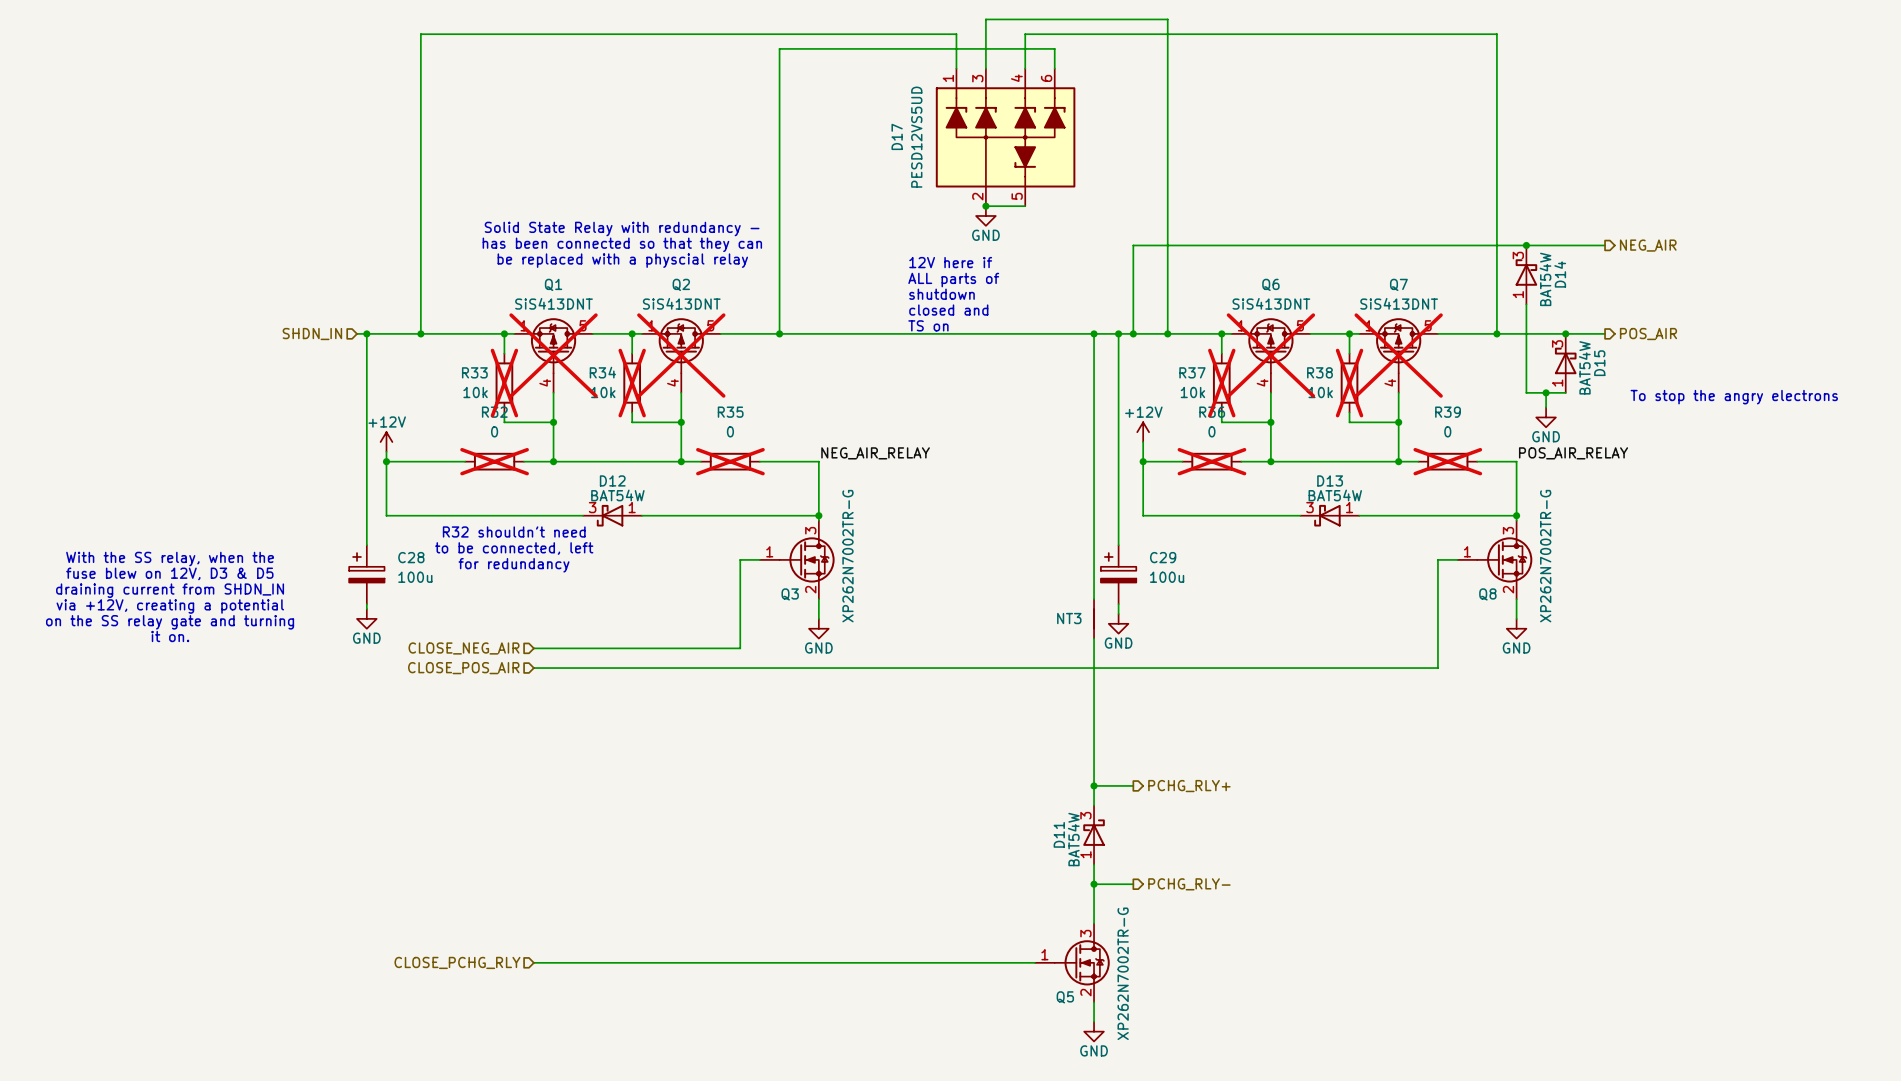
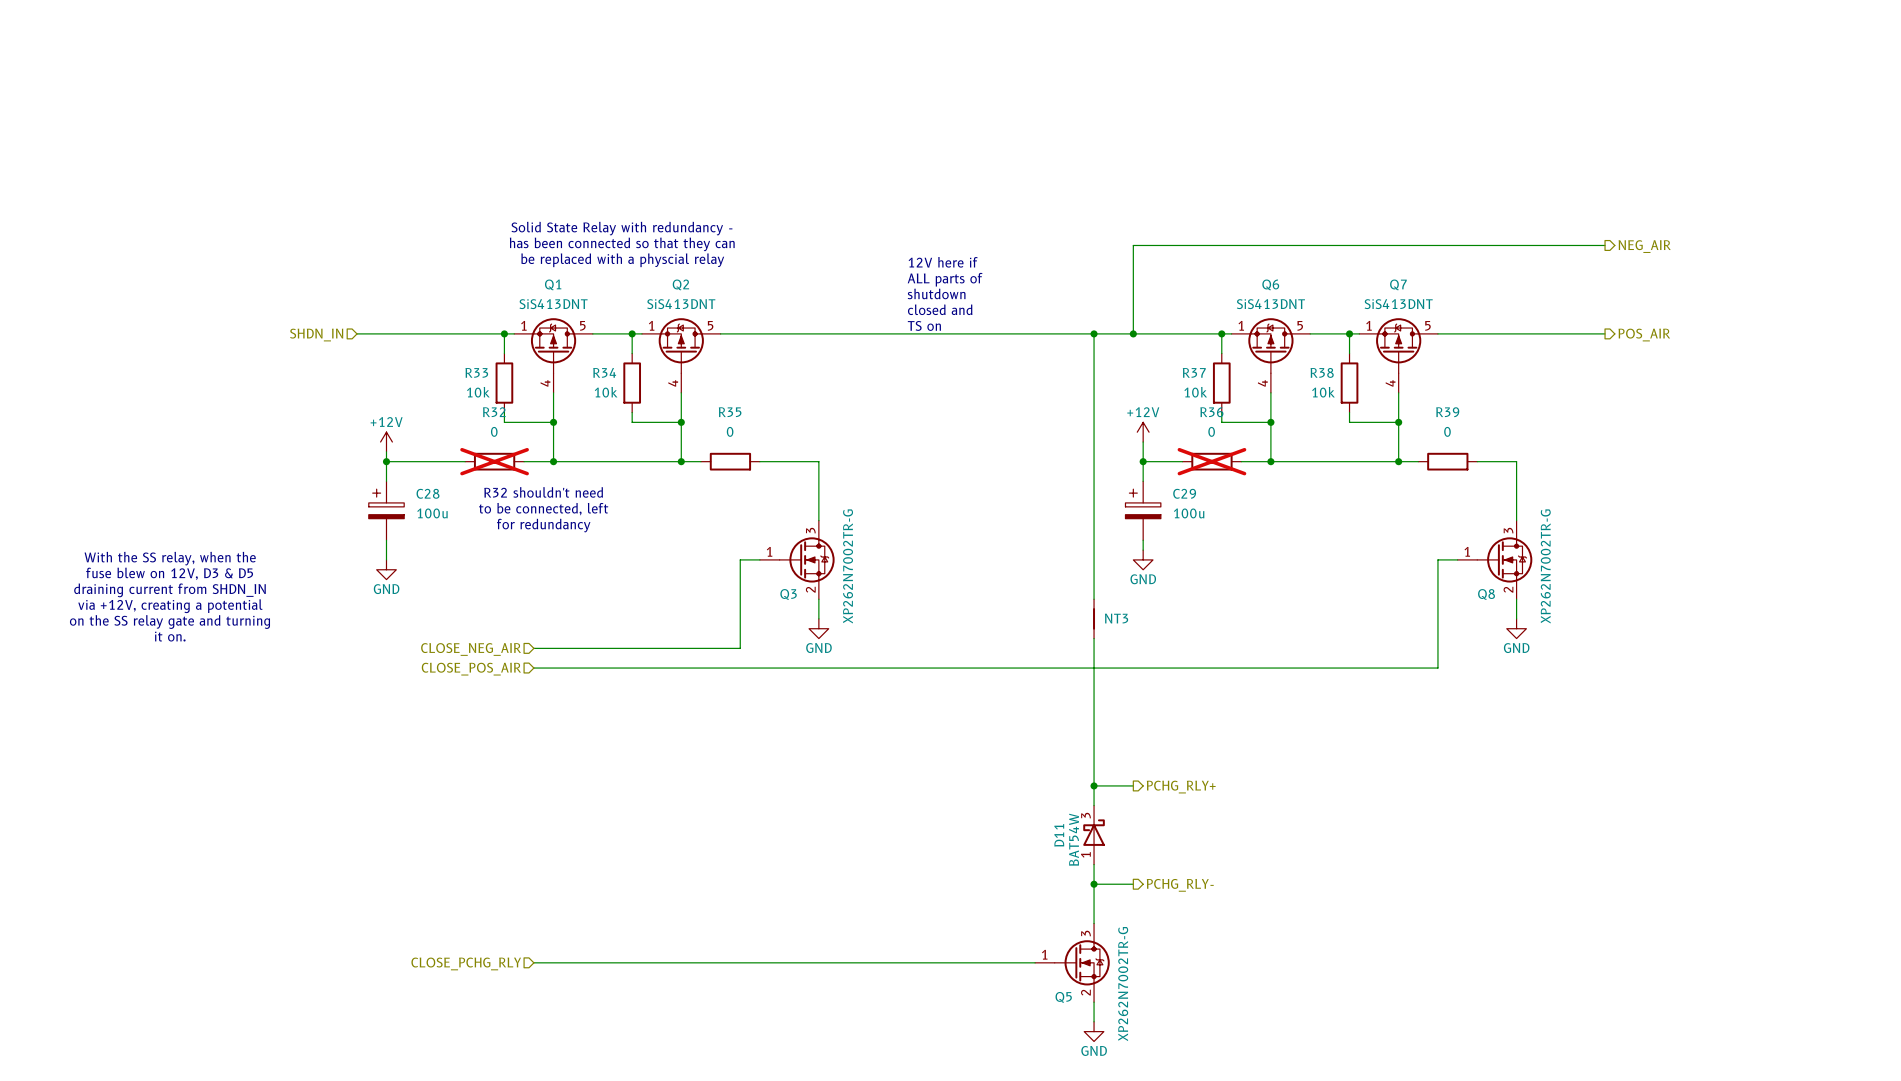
wire: (956, 68) (956, 34) (420, 34) (420, 333) -> none
wire: (985, 68) (985, 19) (1167, 19) (1167, 333) -> none
wire: (1025, 68) (1025, 34) (1496, 34) (1496, 333) -> none
wire: (1054, 68) (1054, 48) (779, 48) (779, 333) -> none
D17: PESD12VS5UD (1005, 137) -> none
wire: (985, 206) (1025, 206) -> none
junction: (985, 206) -> none
power symbol: GND (985, 215) -> none
junction: (1526, 245) -> none
D14: BAT54W (1526, 274) -> none
wire: (1526, 304) (1526, 392) (1565, 392) -> none
wire: (366, 333) (366, 545) -> none
junction: (366, 333) -> none
junction: (420, 333) -> none
junction: (779, 333) -> none
wire: (1118, 333) (1118, 545) -> none
junction: (1118, 333) -> none
junction: (1167, 333) -> none
junction: (1496, 333) -> none
junction: (1565, 333) -> none
Q1 do-not-place cross: (553, 355) -> none
Q2 do-not-place cross: (681, 355) -> none
Q6 do-not-place cross: (1270, 355) -> none
Q7 do-not-place cross: (1398, 355) -> none
D15: BAT54W (1565, 363) -> none
R33 do-not-place cross: (504, 383) -> none
R34 do-not-place cross: (632, 383) -> none
R37 do-not-place cross: (1221, 383) -> none
R38 do-not-place cross: (1349, 383) -> none
wire: (1546, 392) (1546, 407) -> none
junction: (1546, 392) -> none
text: To stop the angry electrons (1734, 397) -> none
power symbol: GND (1546, 417) -> none
label: NEG_AIR_RELAY (875, 453) -> none
label: POS_AIR_RELAY (1573, 453) -> none
R35 do-not-place cross: (730, 461) -> none
R39 do-not-place cross: (1447, 461) -> none
wire: (386, 481) (386, 515) (583, 515) -> none
wire: (1143, 481) (1143, 515) (1300, 515) -> none
D12: BAT54W (612, 515) -> none
wire: (641, 515) (818, 515) -> none
junction: (818, 515) -> none
D13: BAT54W (1329, 515) -> none
wire: (1359, 515) (1516, 515) -> none
junction: (1516, 515) -> none
text position: R32 shouldn't need (514, 531) -> R32 shouldn't need (543, 492)
wire: none -> (386, 540) (386, 559)
text position: to be connected, left (514, 548) -> to be connected, left (543, 509)
text position: for redundancy (514, 565) -> for redundancy (543, 525)
C28 position: (366, 574) -> (386, 510)
C29 position: (1118, 574) -> (1143, 510)
wire: (366, 604) (366, 609) -> none
wire: (1118, 604) (1118, 613) -> (1143, 540) (1143, 550)
power symbol position: GND (366, 618) -> GND (386, 569)
NT3 name position: NT3 (1069, 618) -> NT3 (1116, 618)
power symbol position: GND (1118, 623) -> GND (1143, 559)

